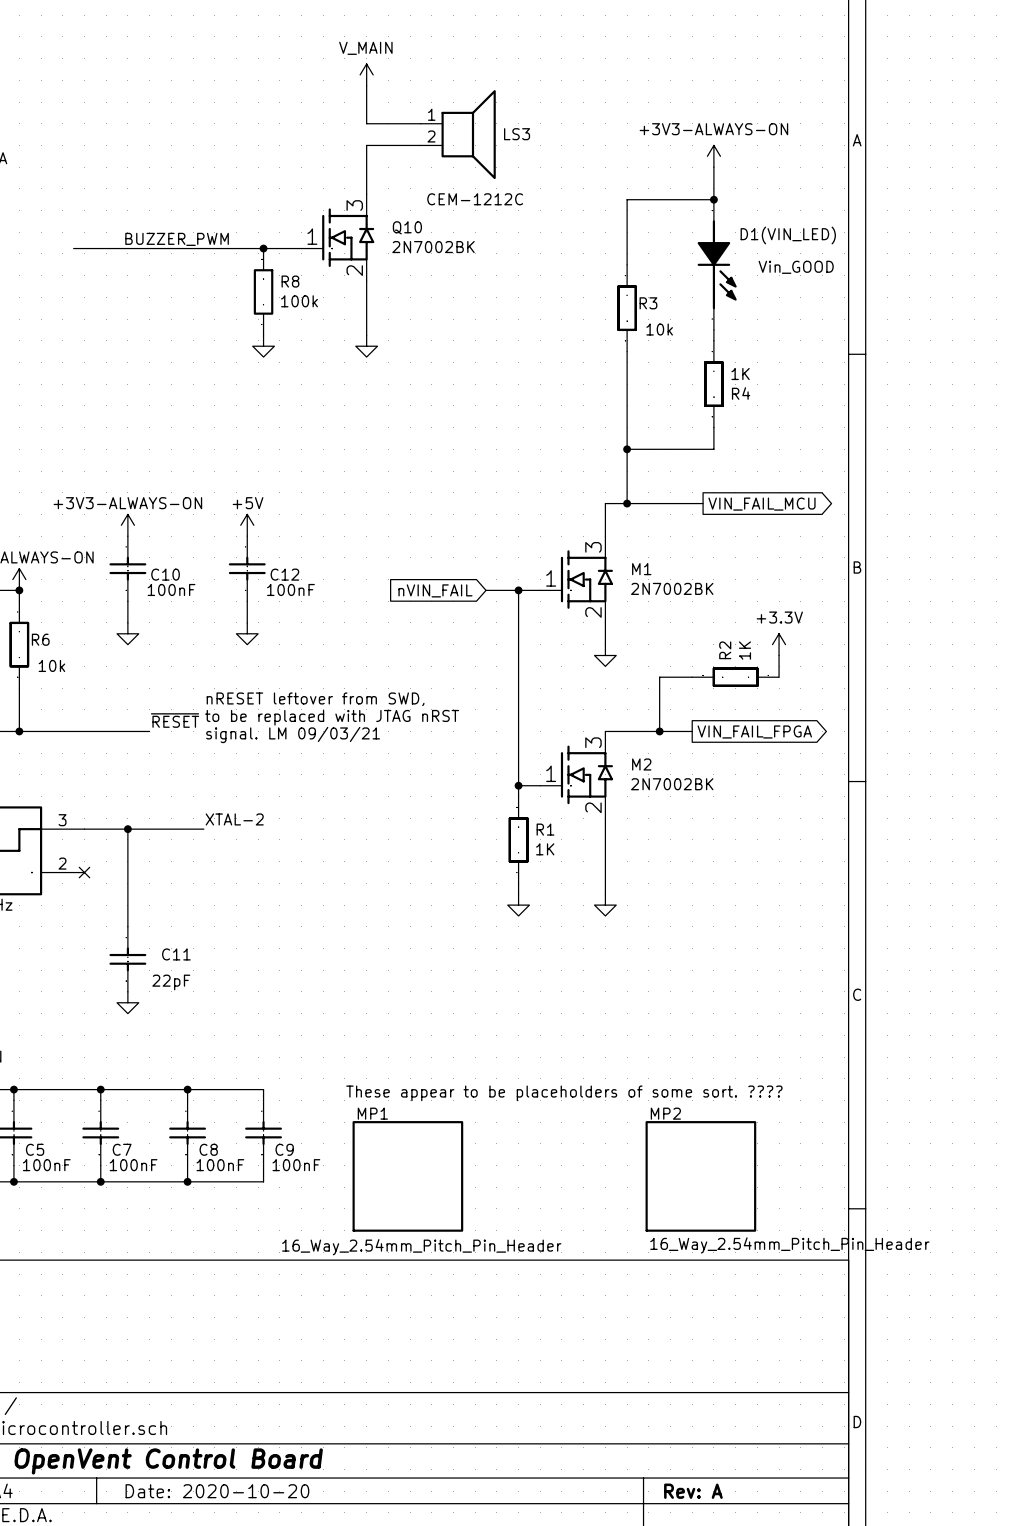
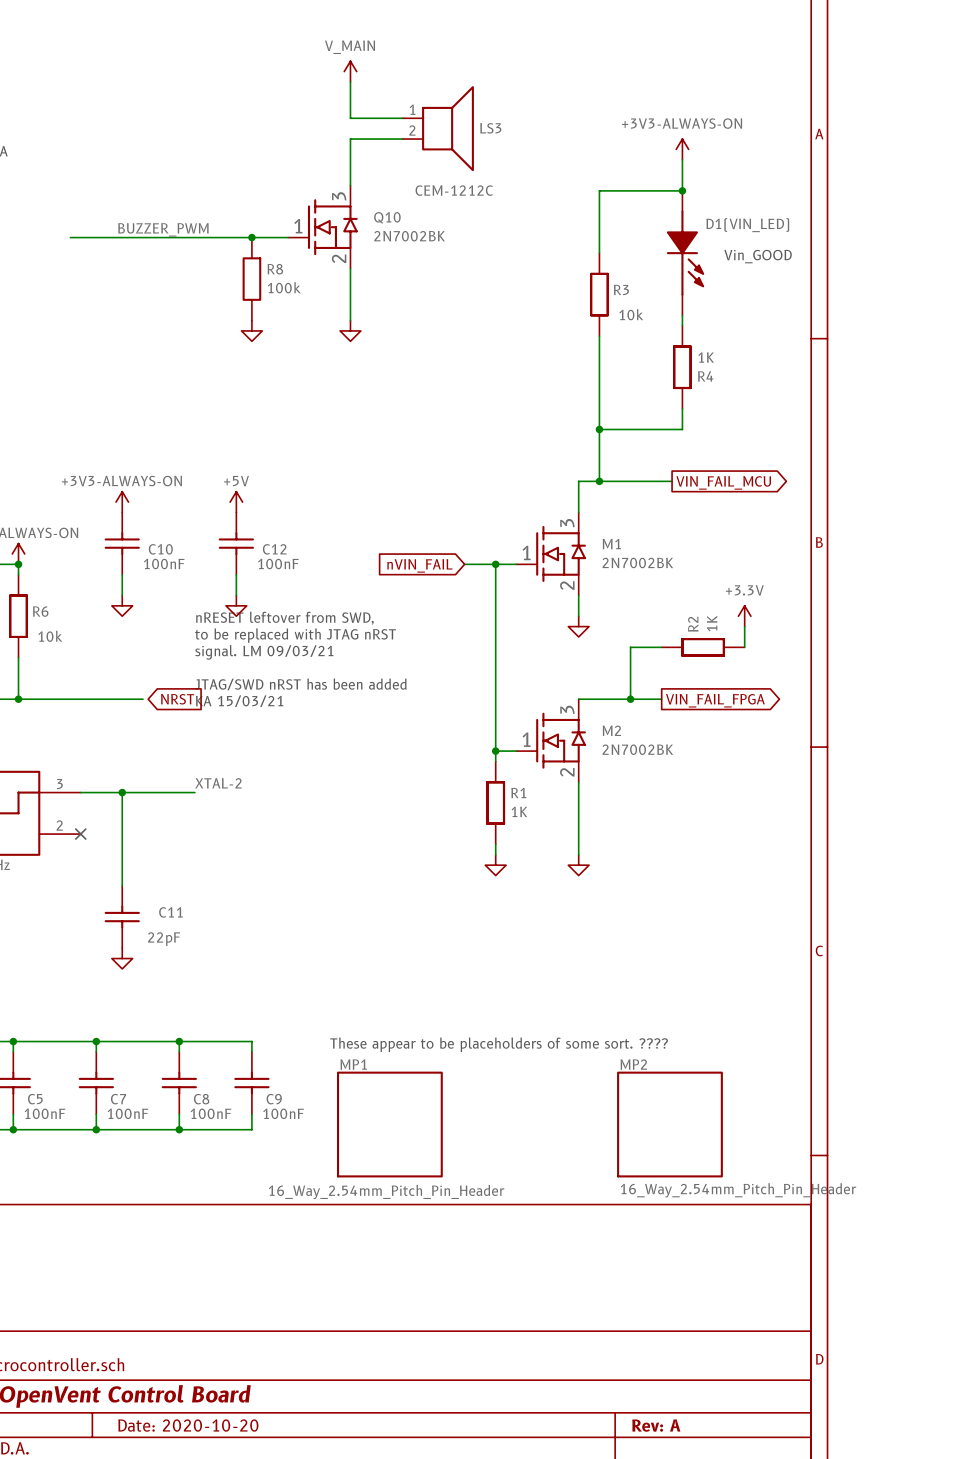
text: none -> to be replaced with JTAG nRST (295, 635)
text: none -> signal. LM 09/03/21 (264, 652)
text position: nRESET leftover from SWD, (315, 699) -> nRESET leftover from SWD, (284, 618)
text: to be replaced with JTAG nRST (332, 717) -> JTAG/SWD nRST has been added (300, 684)
label: ~{RESET} (175, 720) -> none
global label: none -> NRST (177, 699)
text: signal. LM 09/03/21 (293, 734) -> KA 15/03/21 (239, 701)

